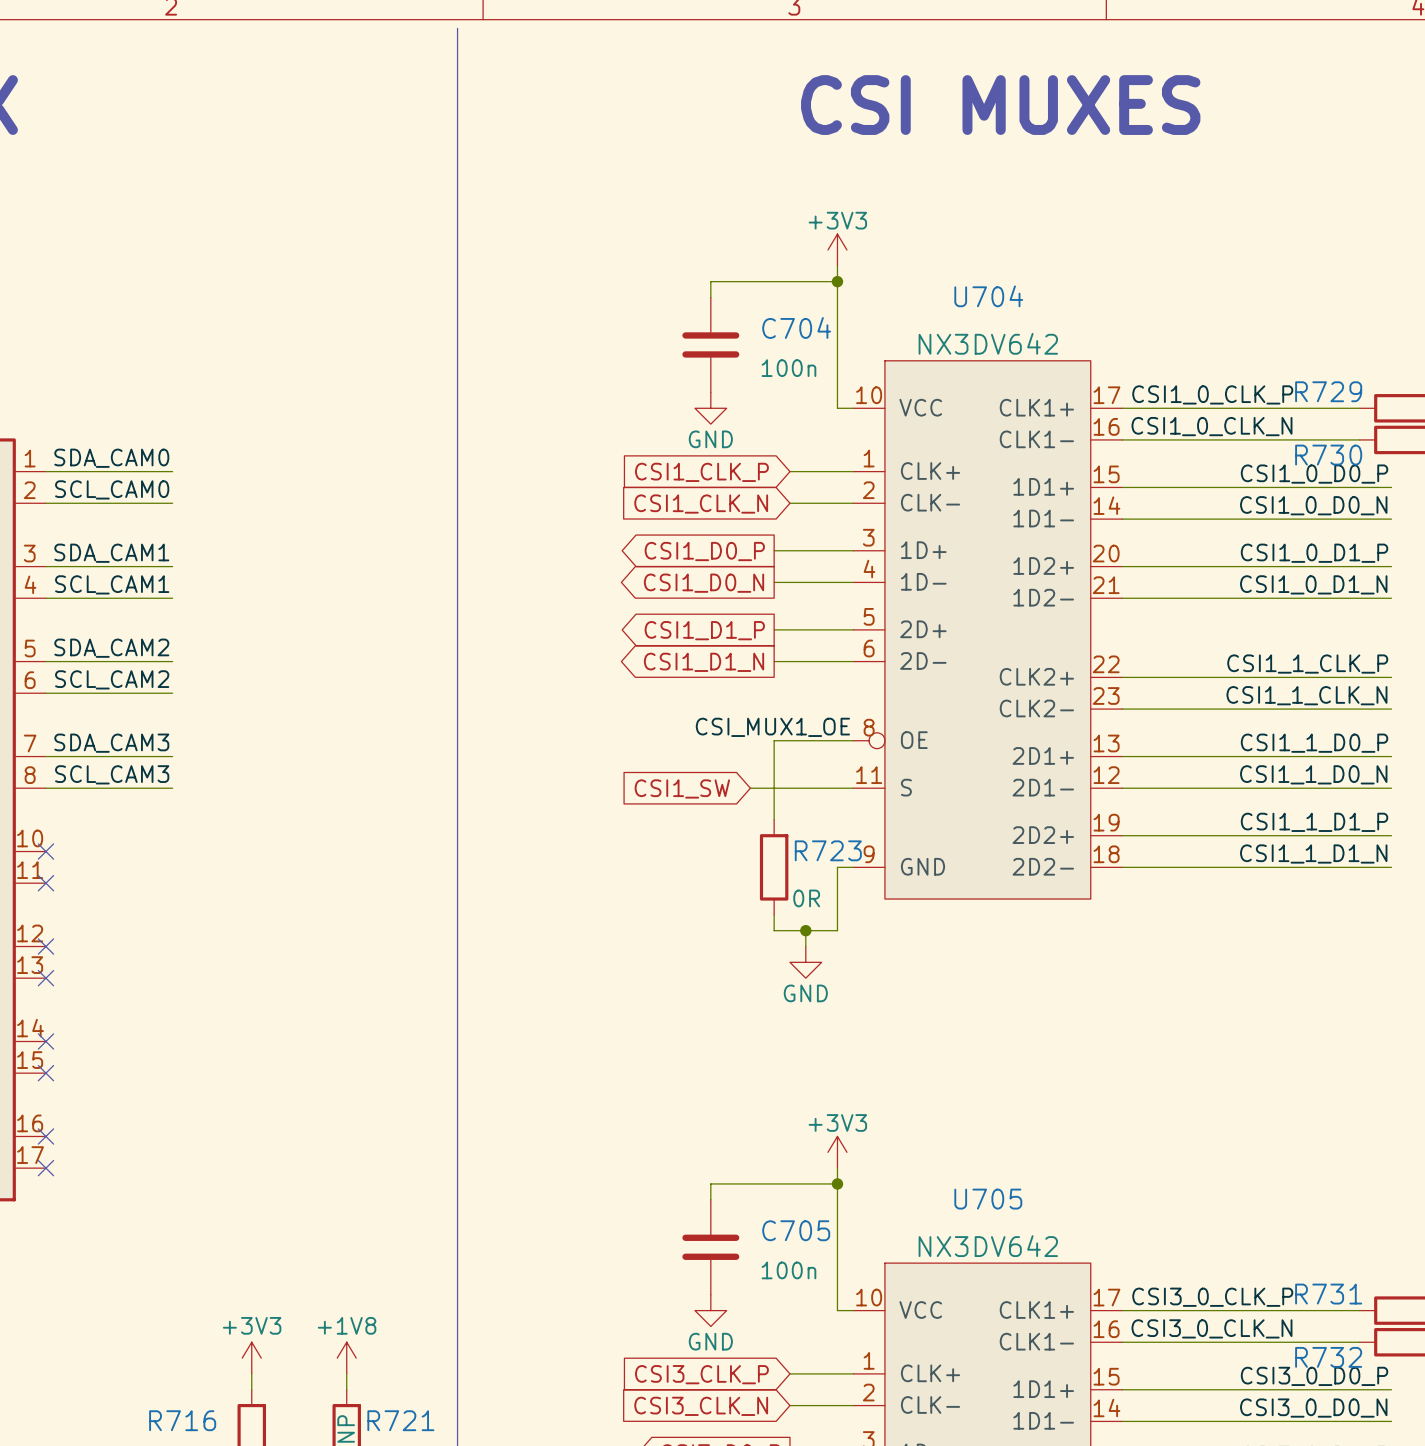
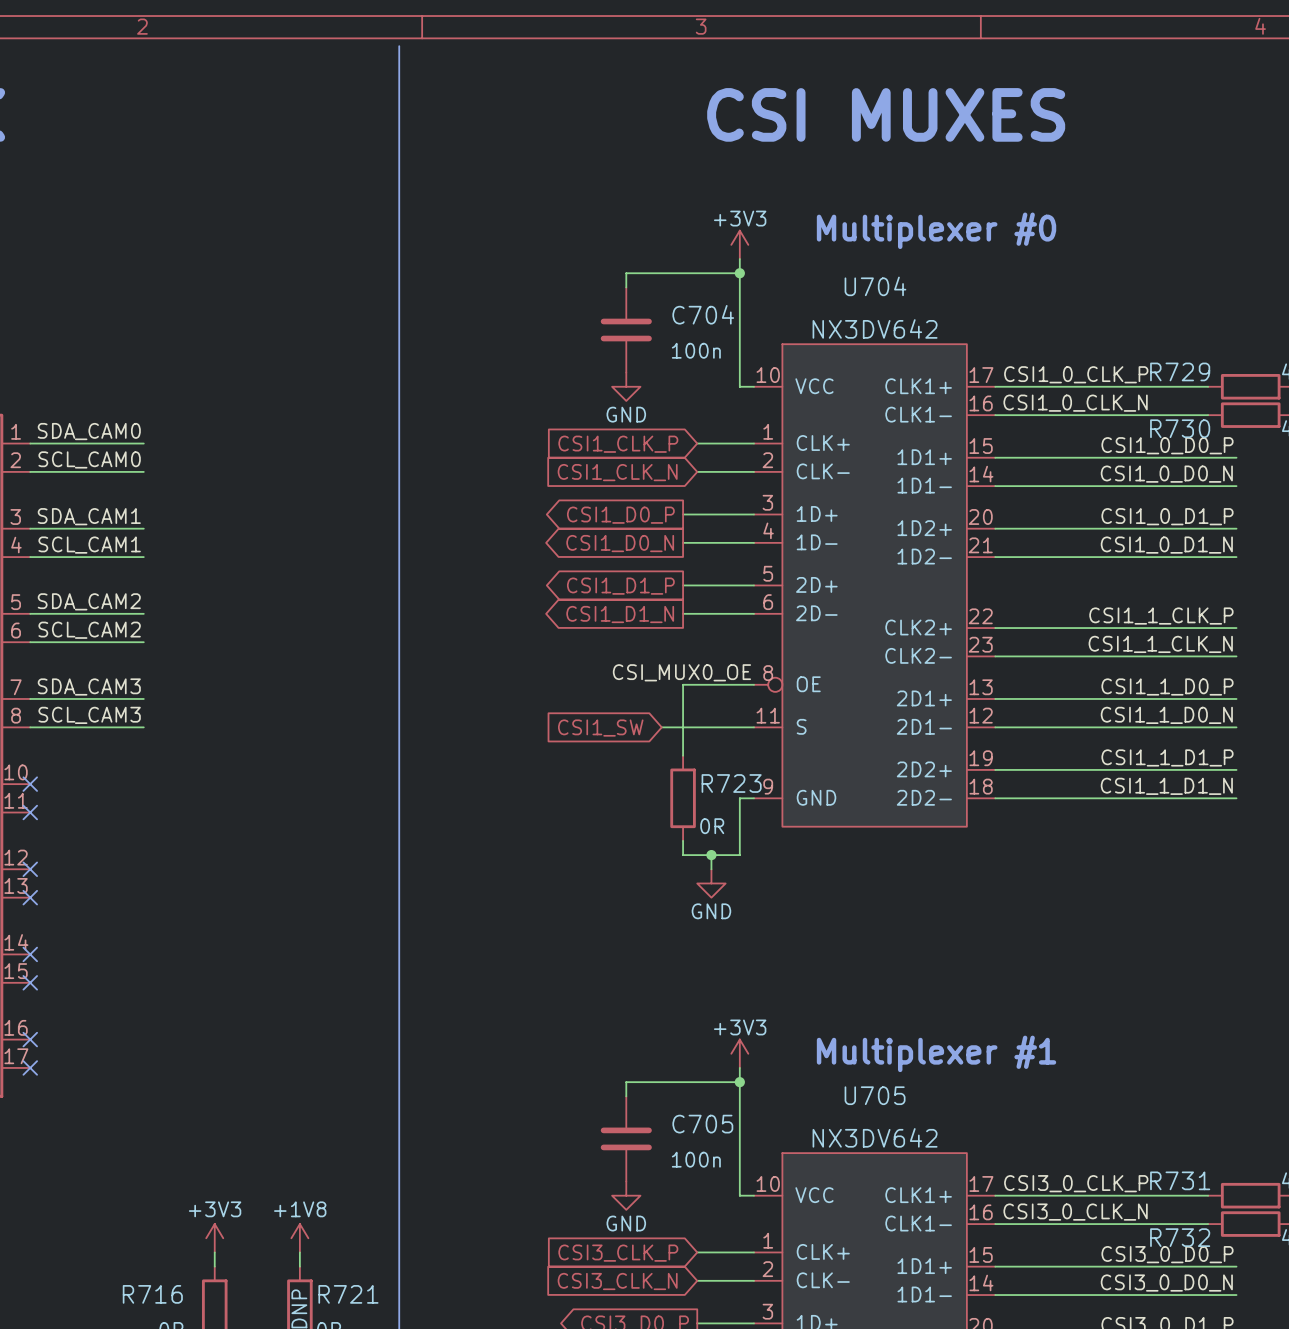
text: none -> Multiplexer #0 (936, 230)
label: CSI_MUX1_OE (772, 727) -> CSI_MUX0_OE (681, 672)
text: none -> Multiplexer #1 (936, 1053)

